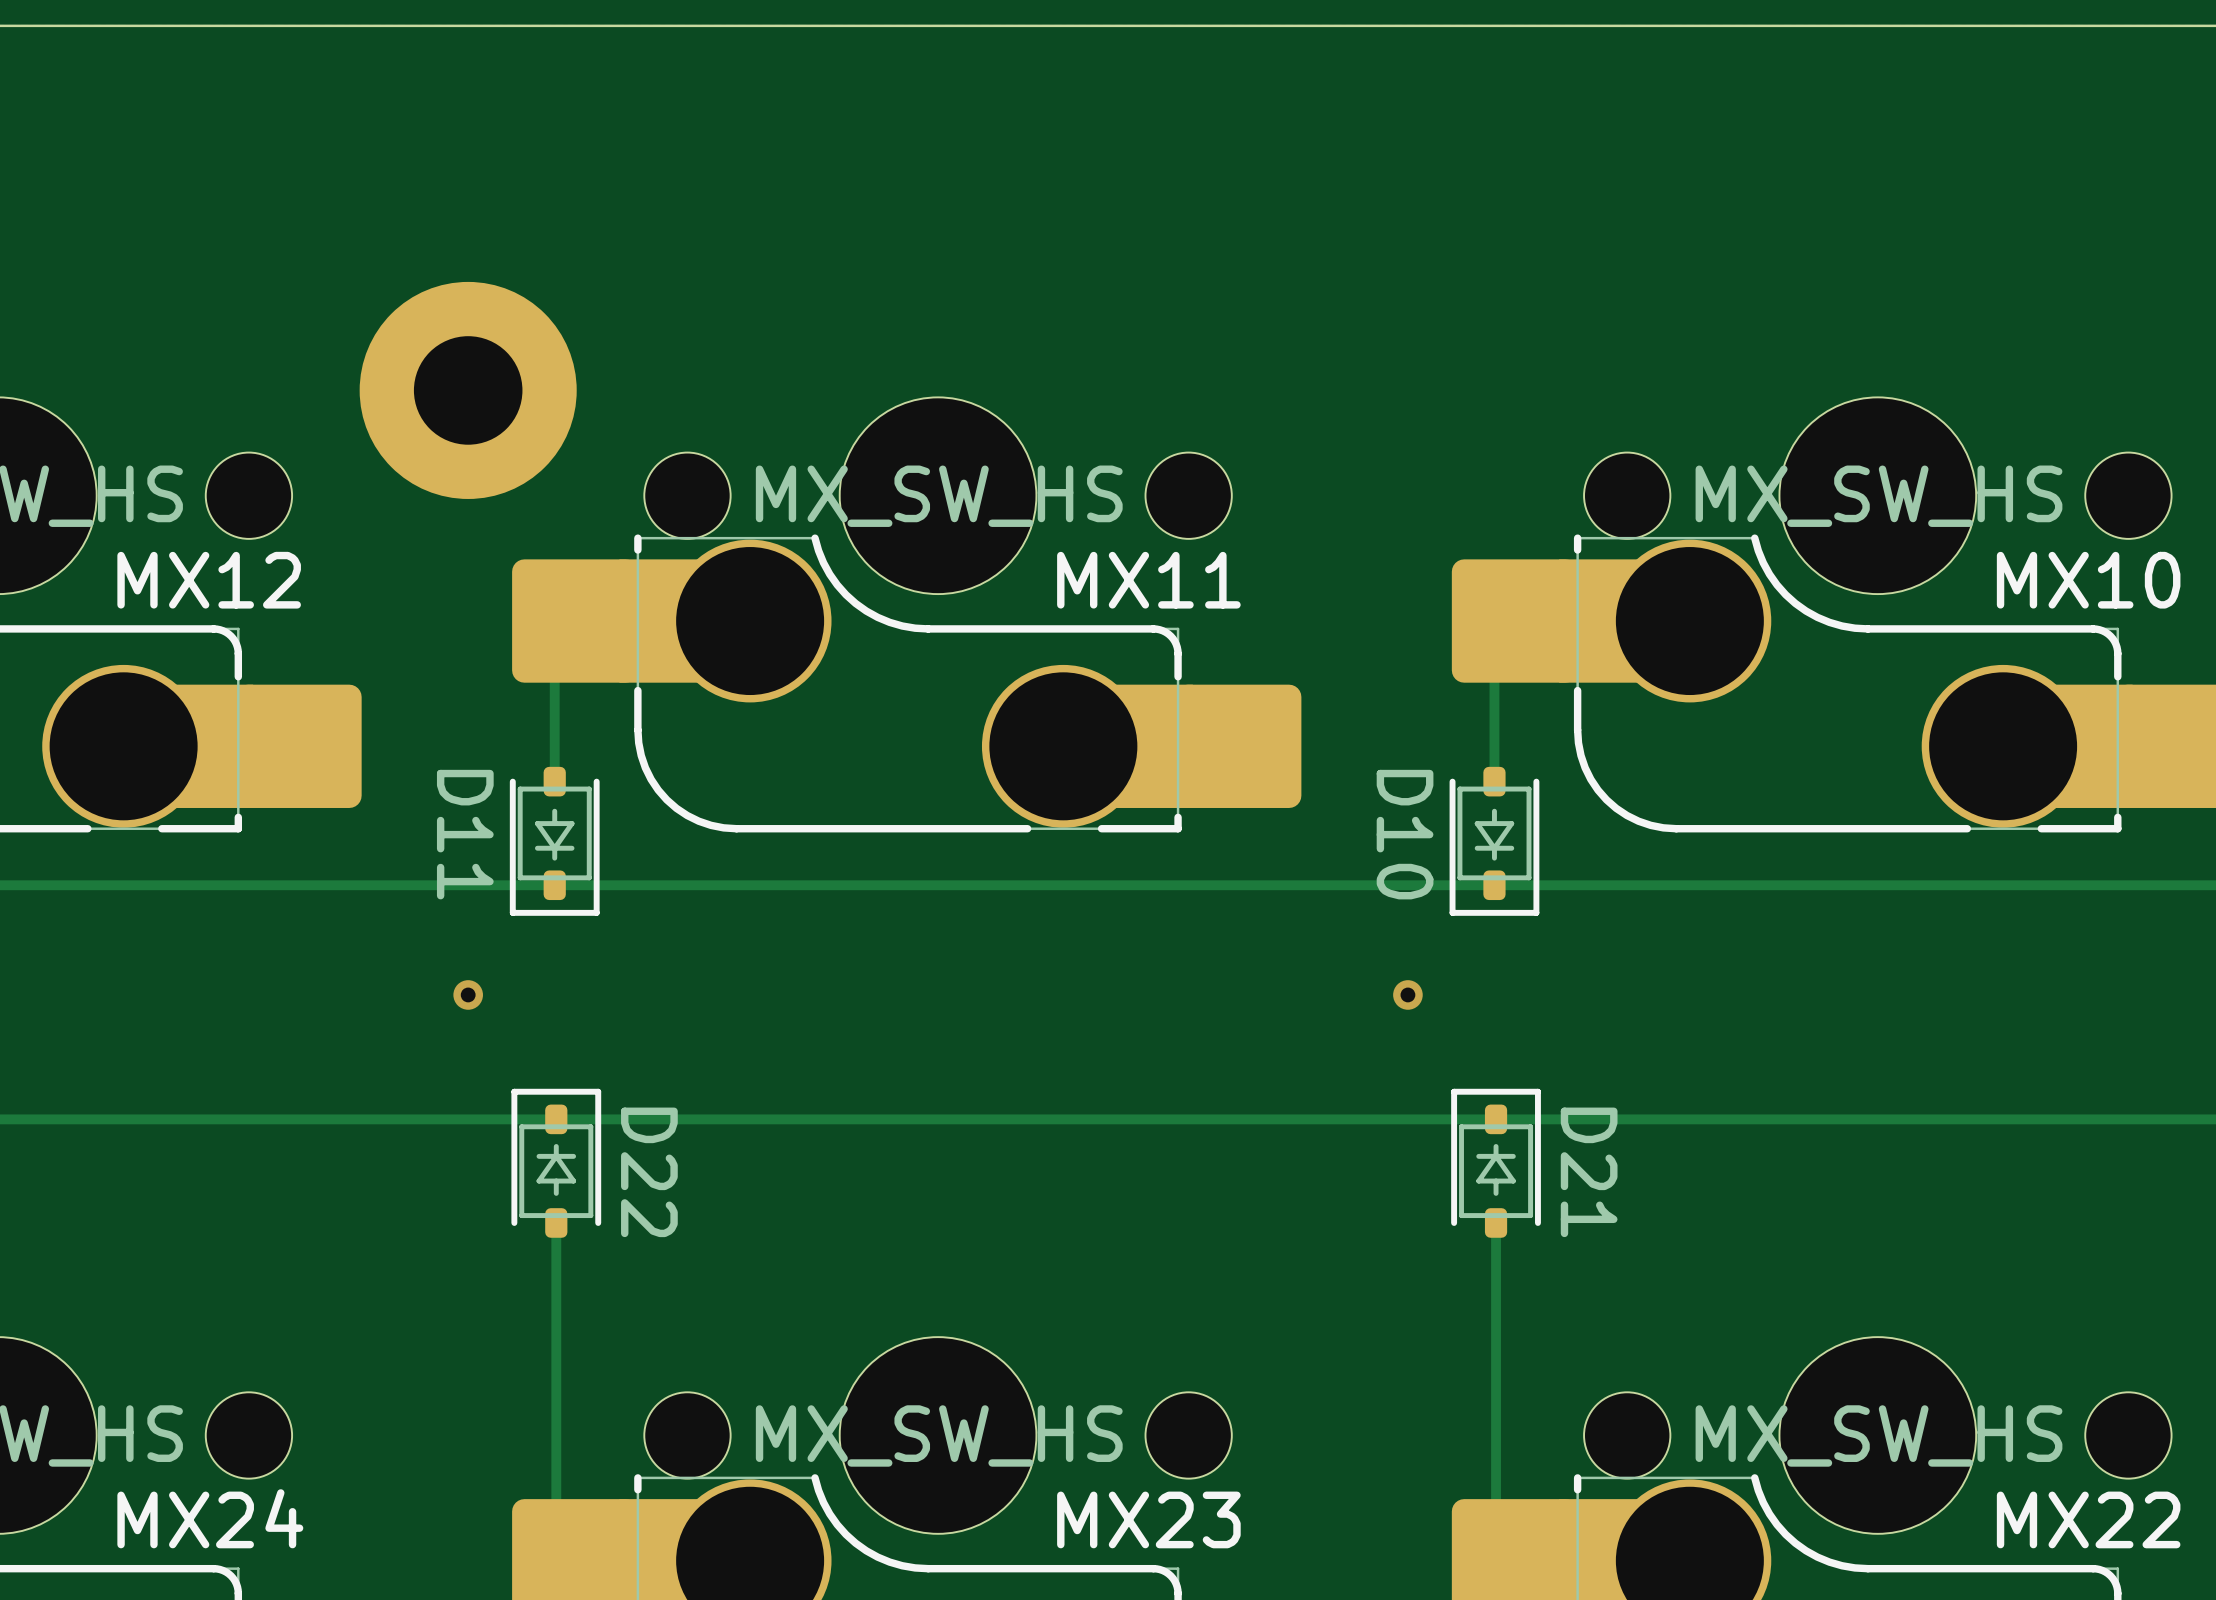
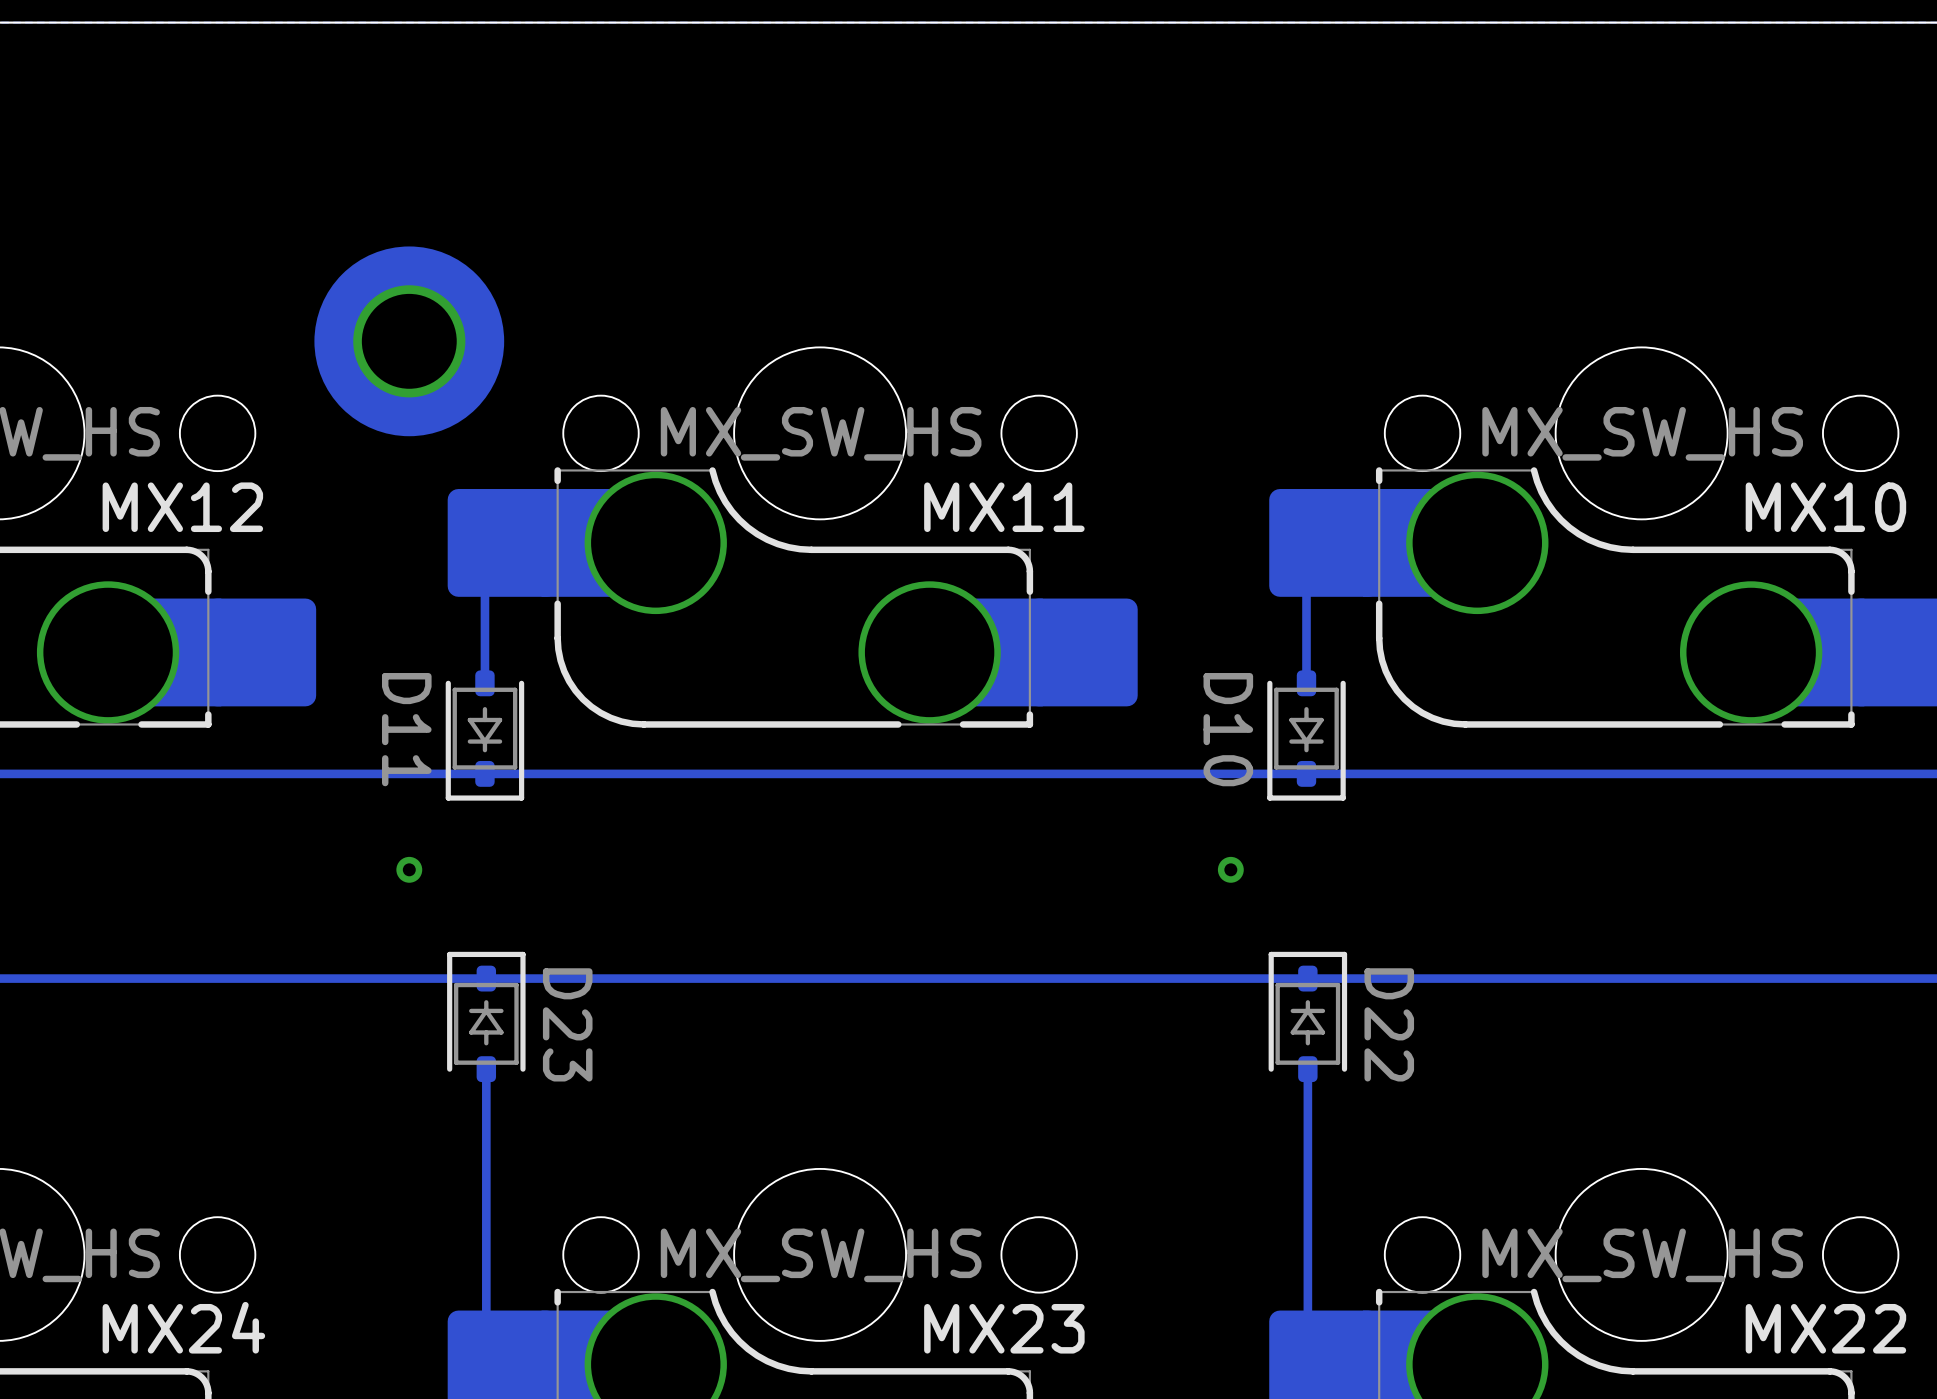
D22 name: D22 (649, 1172) -> D23 (567, 1024)
D21 name: D21 (1589, 1172) -> D22 (1389, 1024)

